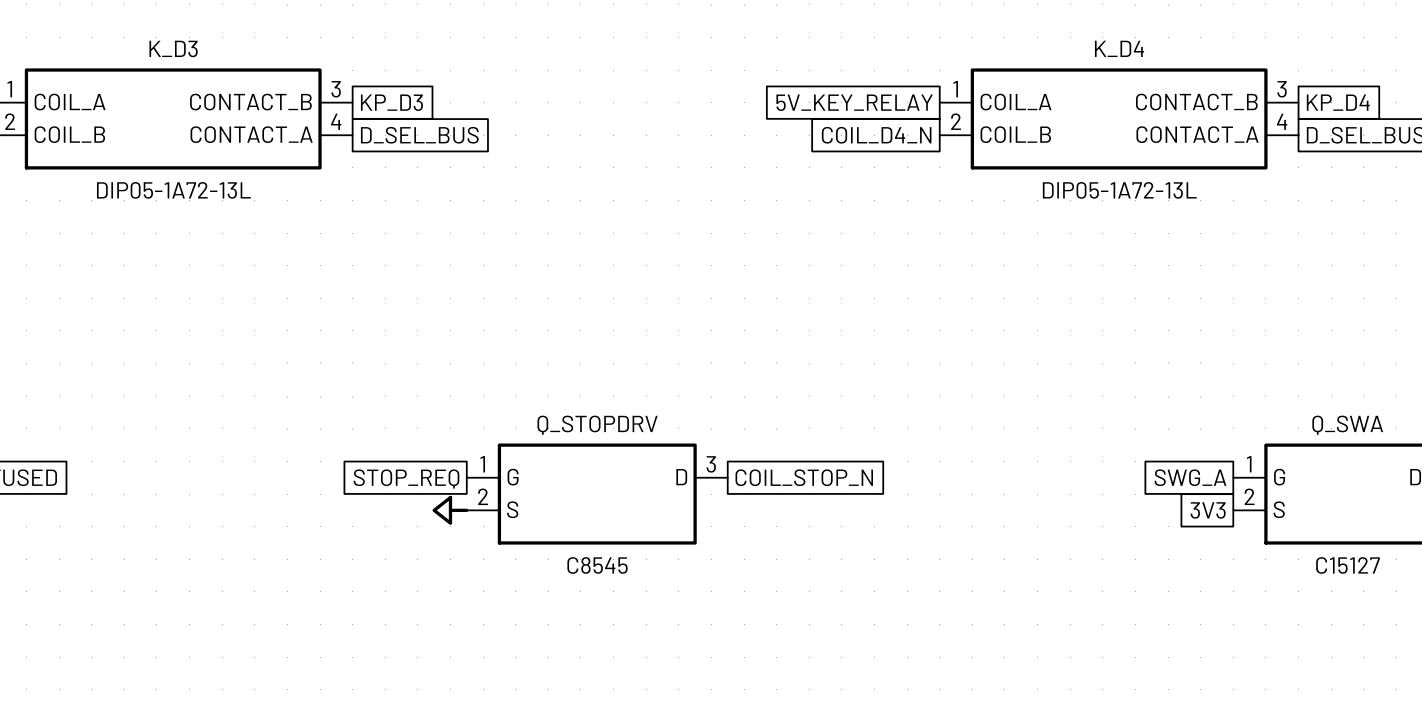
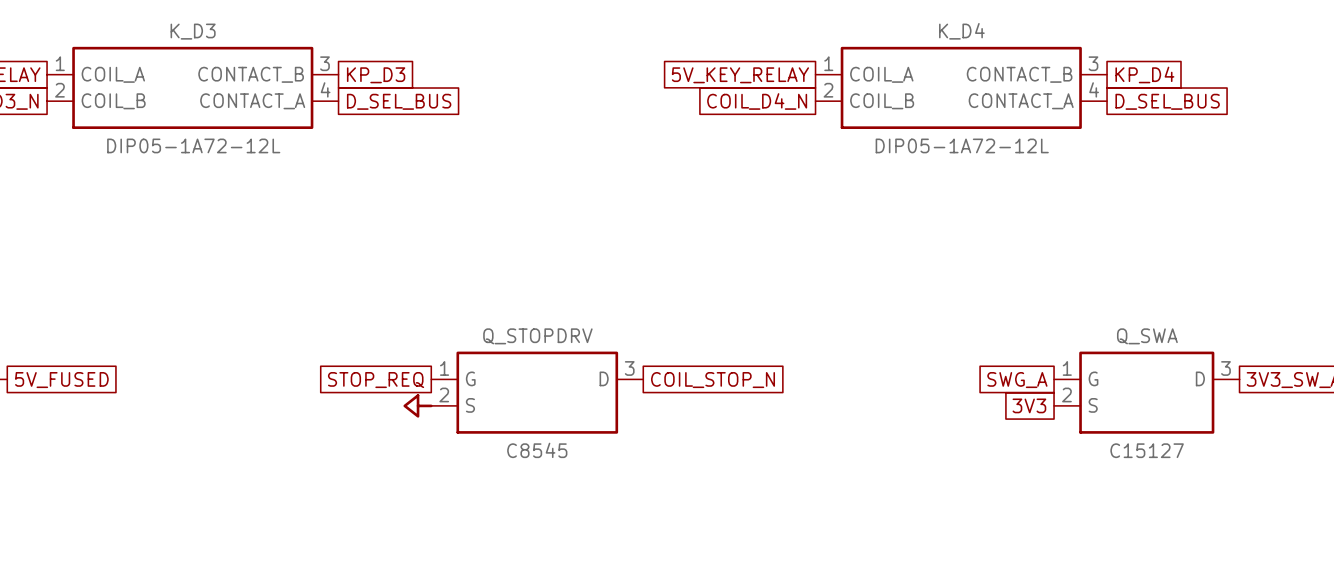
K_D3 value: DIP05-1A72-13L (173, 190) -> DIP05-1A72-12L (193, 145)
K_D4 value: DIP05-1A72-13L (1119, 190) -> DIP05-1A72-12L (962, 145)

